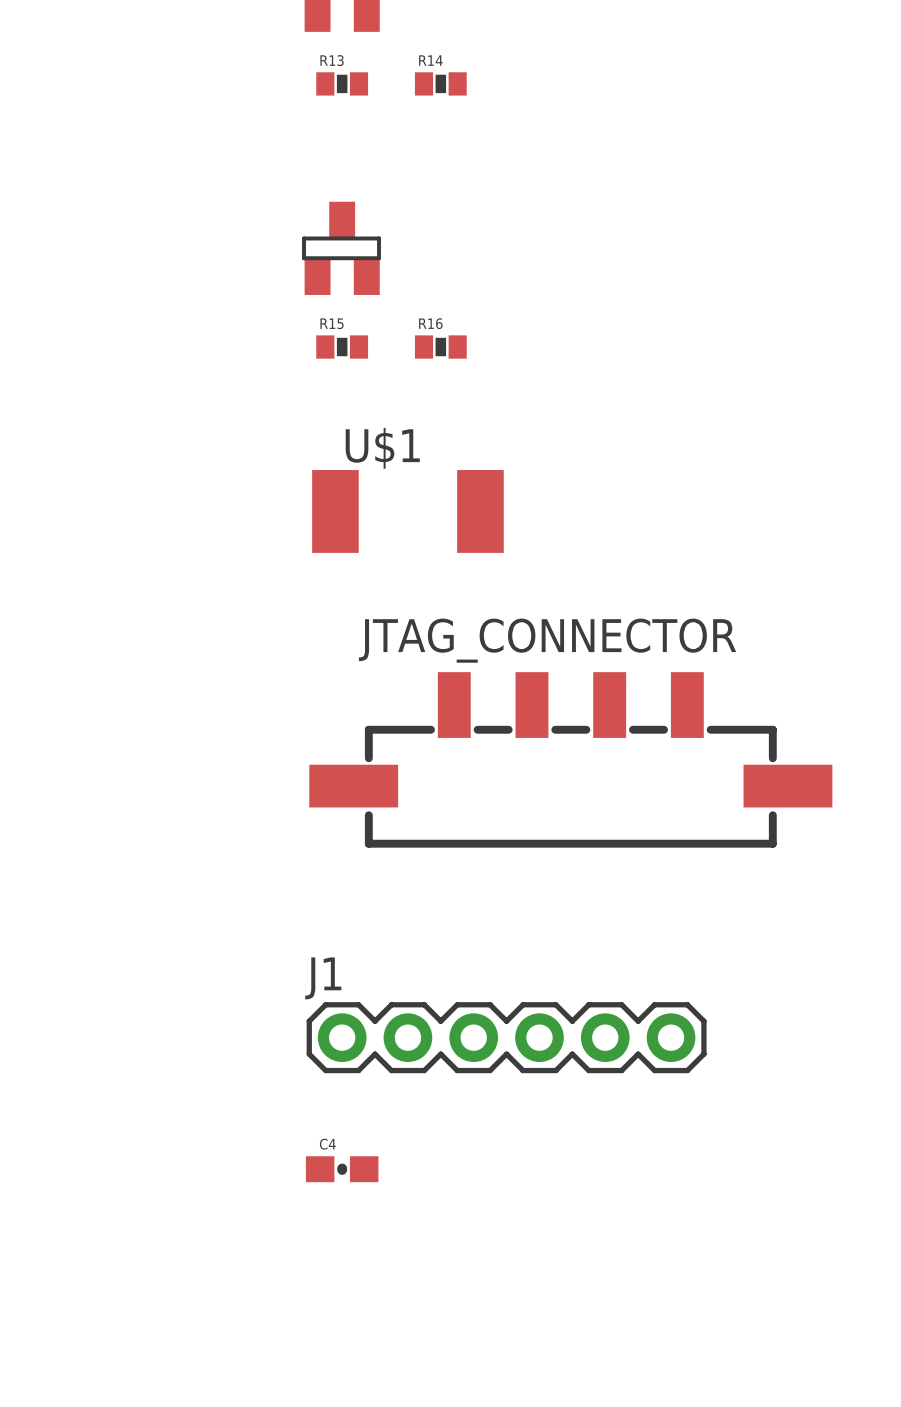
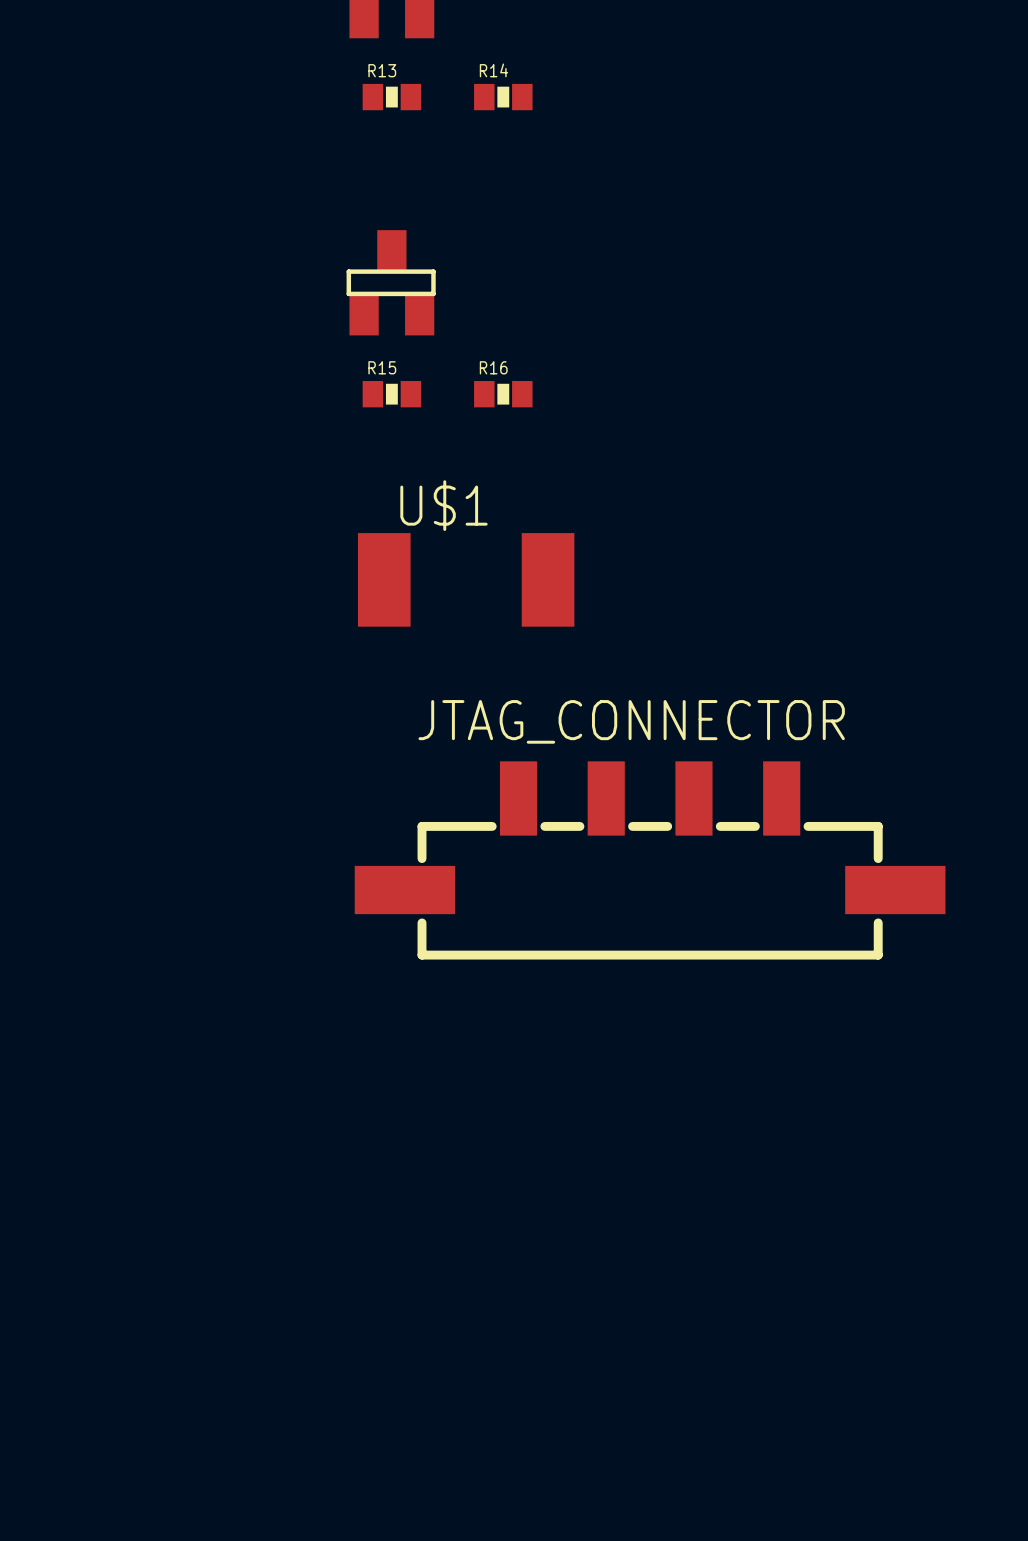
J1: (506, 1037) -> none
C4: (342, 1169) -> none

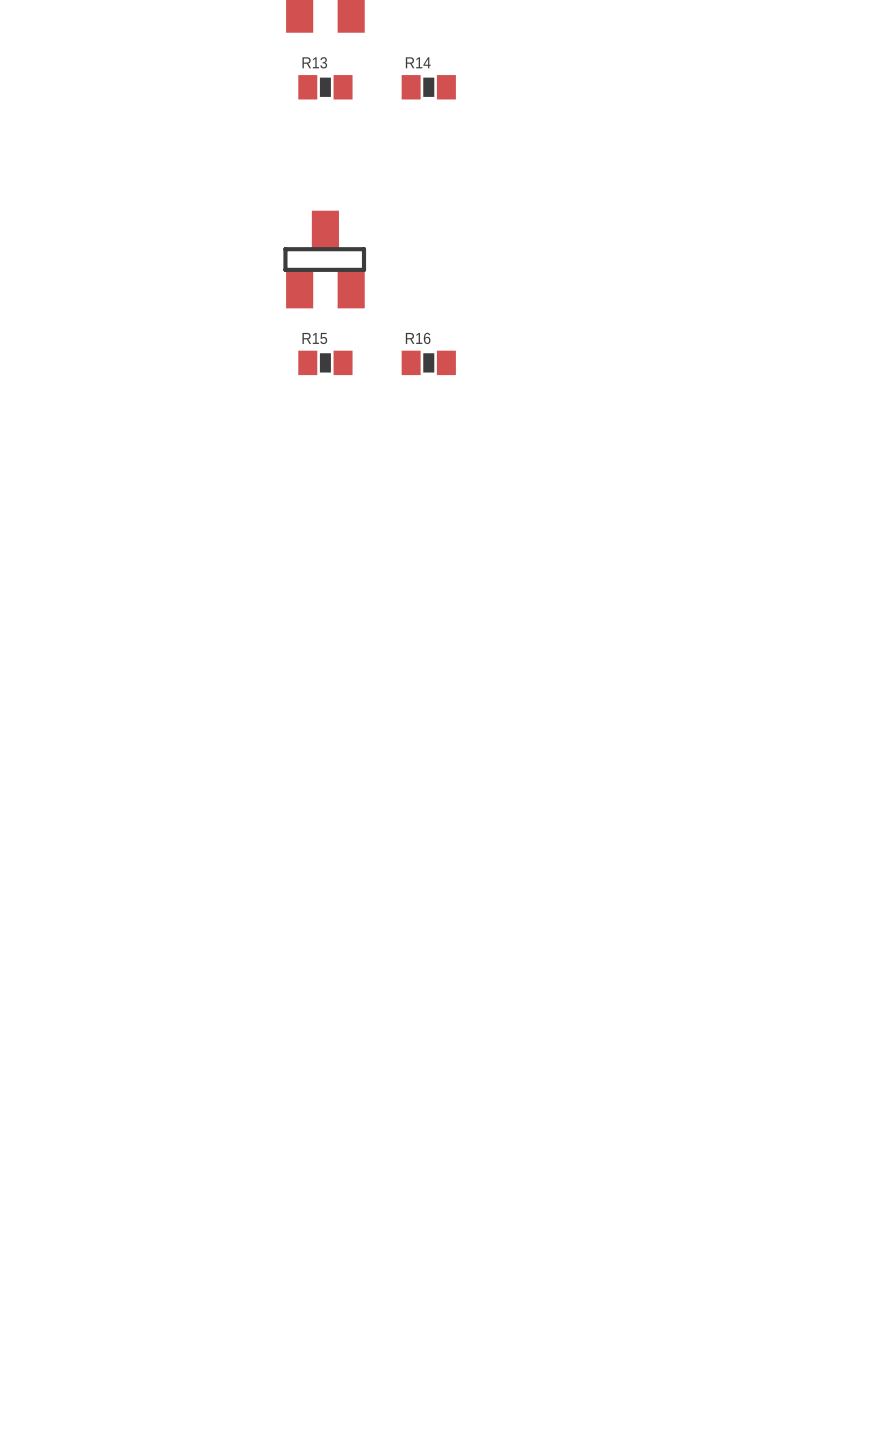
U$1: (466, 579) -> none
JTAG_CONNECTOR: (650, 860) -> none

